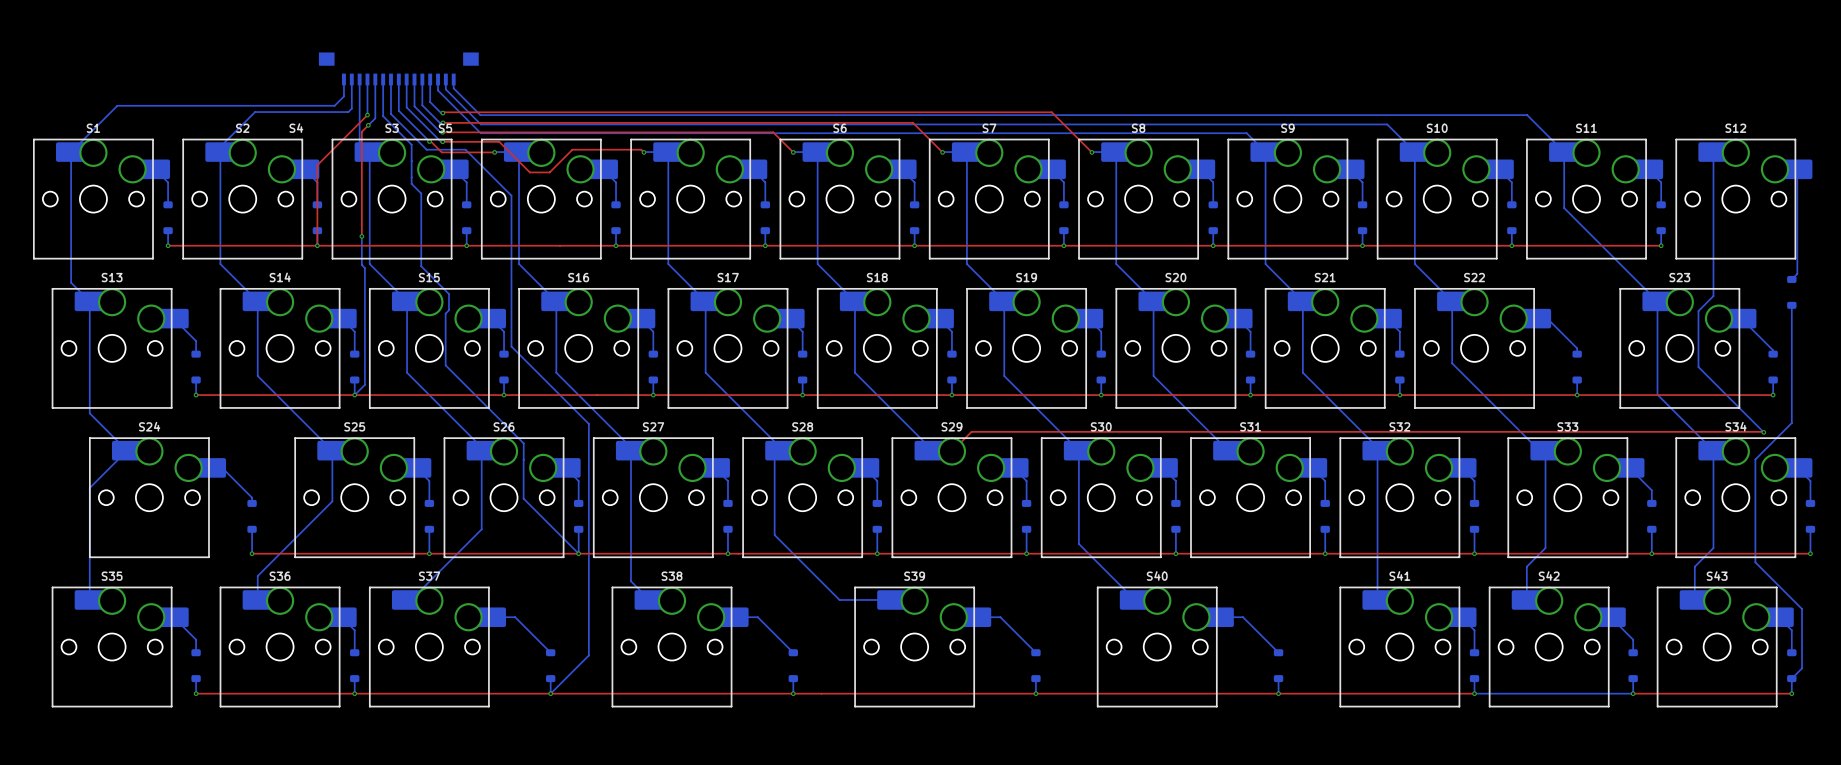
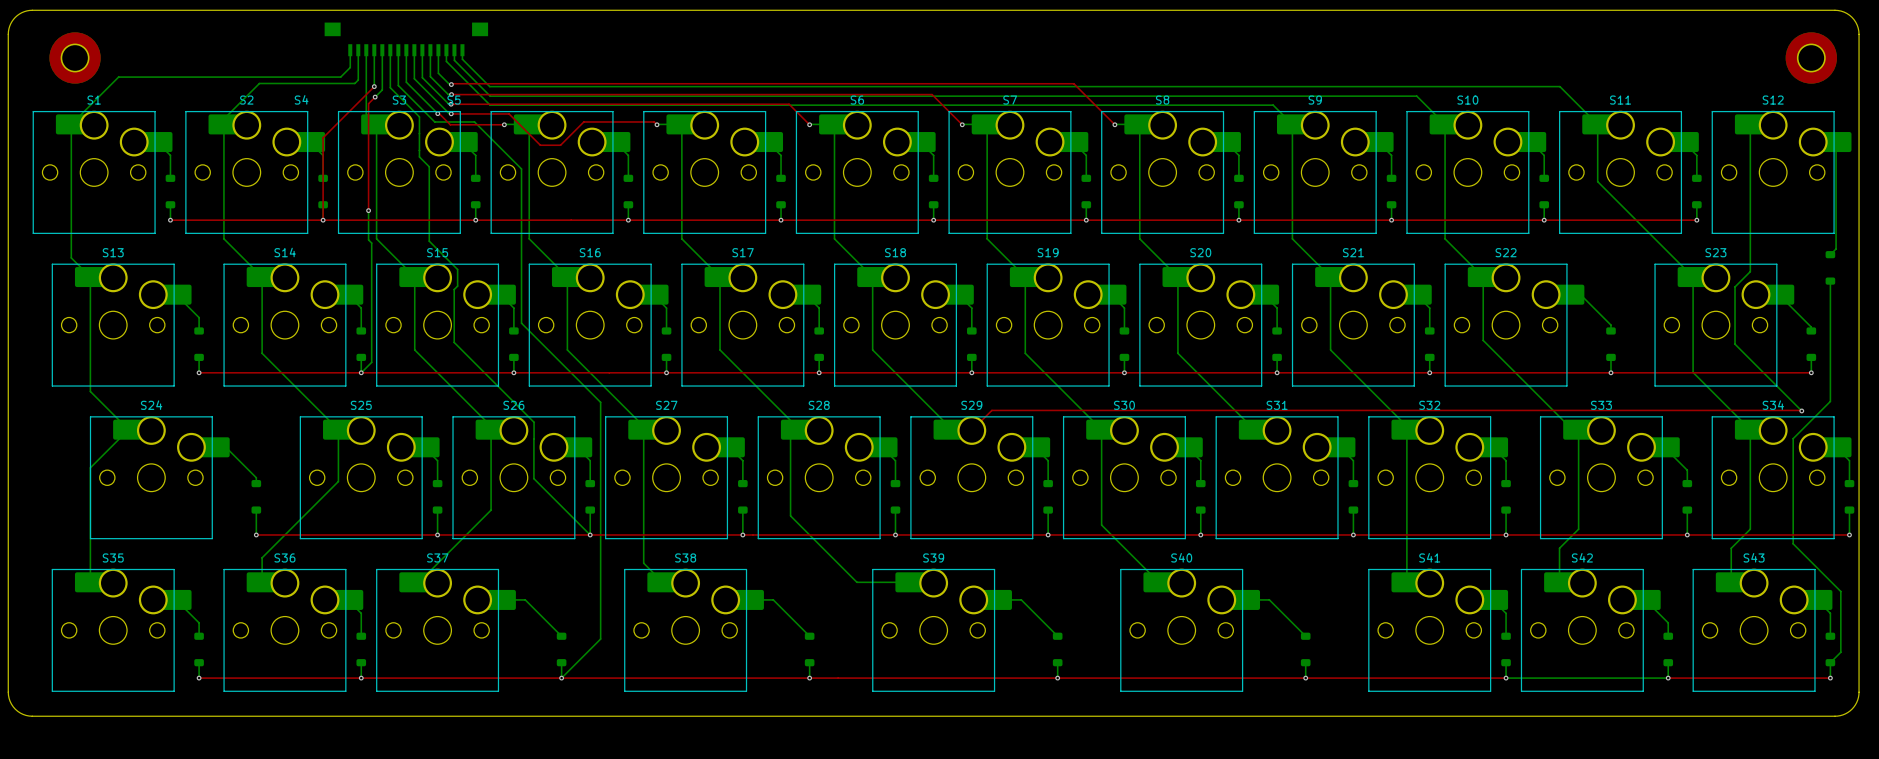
board edge: none -> (32, 10) (1834, 10) (1844, 12) (1854, 19) (1859, 34) (1857, 700) (1847, 712) (1834, 716) (32, 716) (23, 714) (11, 704) (8, 692) (8, 34) (9, 26) (15, 17) (24, 11) (32, 10)
part: none -> (75, 57)
part: none -> (1811, 57)

